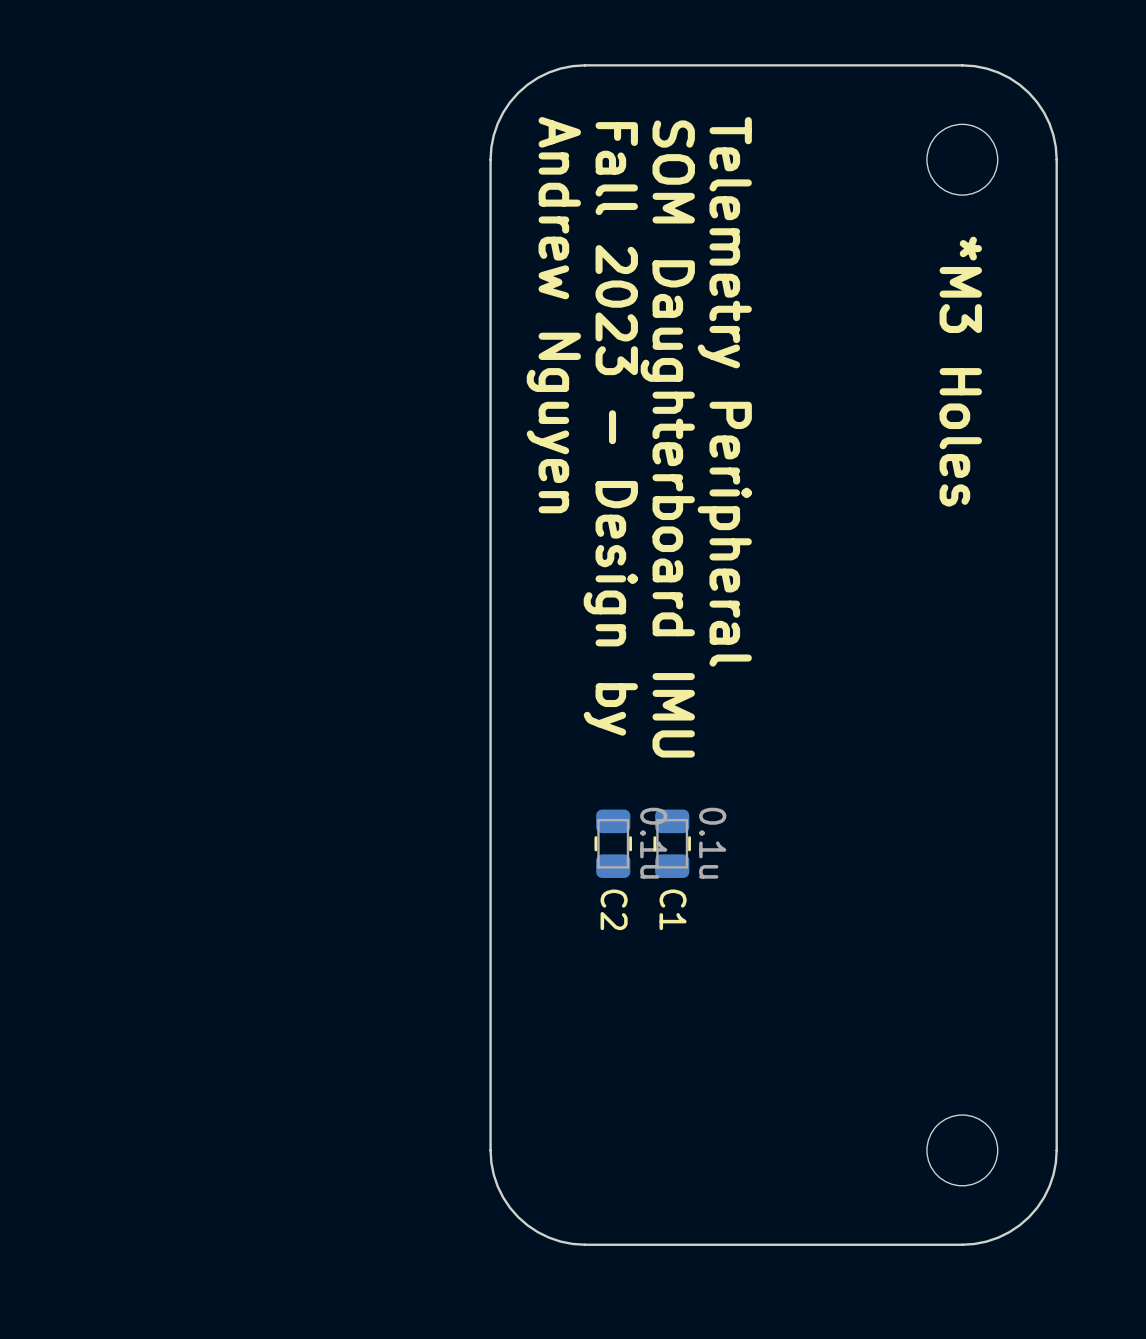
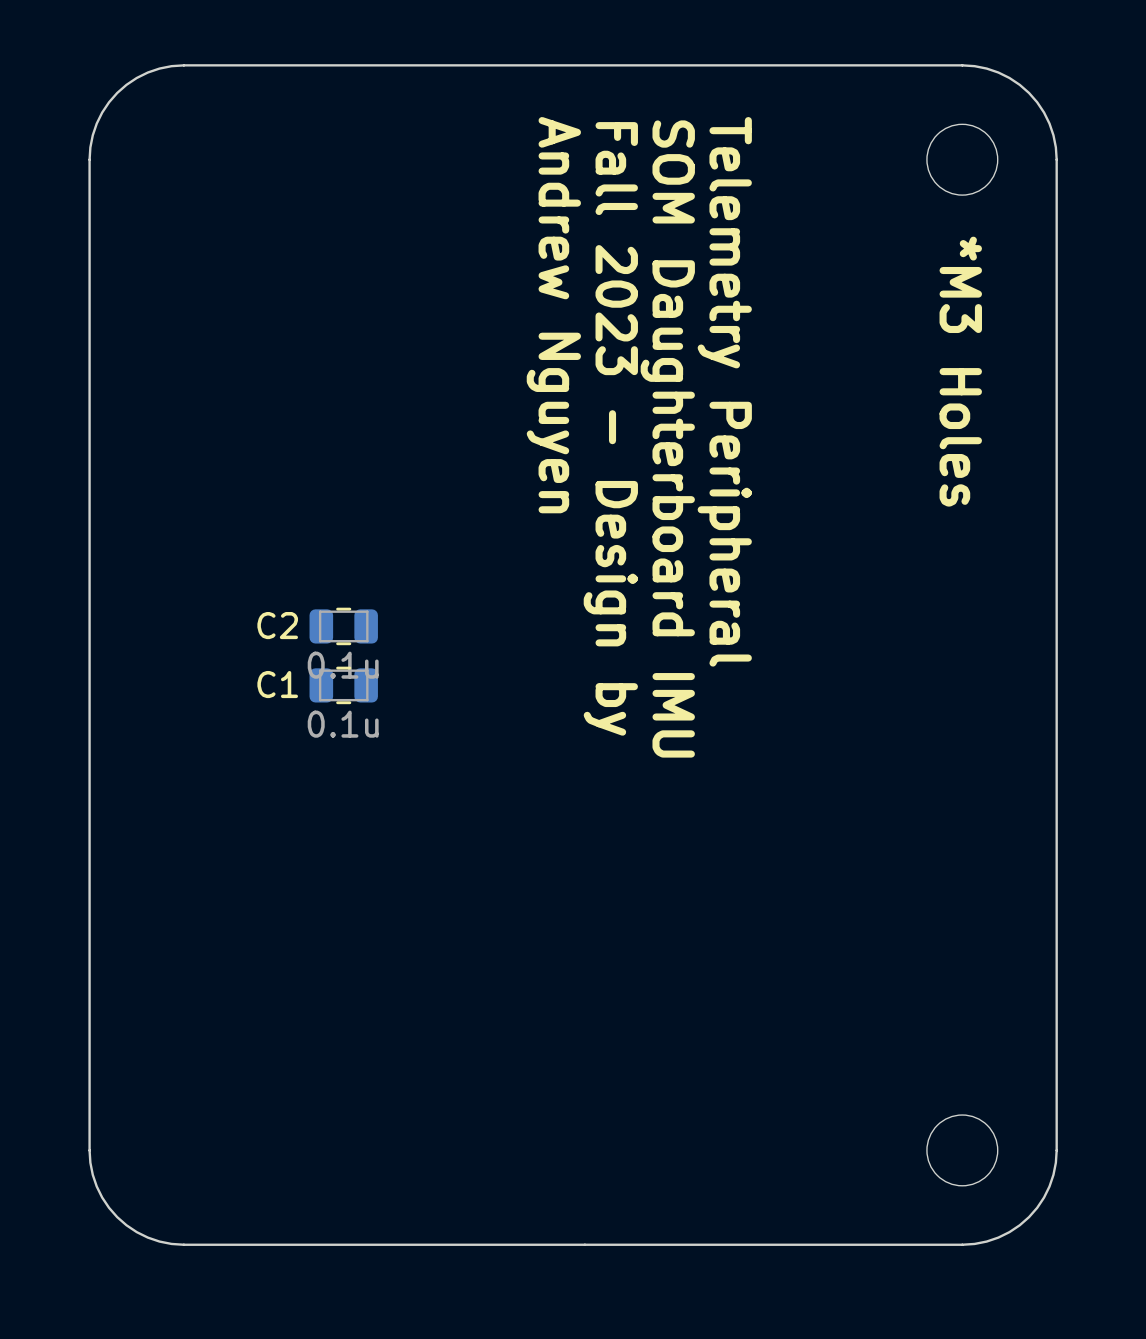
board edge: (584, 65) (560, 68) (548, 72) (537, 78) (518, 92) (510, 102) (497, 123) (493, 135) (490, 159) (491, 1162) (493, 1174) (503, 1197) (518, 1217) (537, 1232) (548, 1237) (560, 1241) (584, 1244) -> (584, 65) (171, 66) (147, 72) (136, 78) (117, 92) (109, 102) (96, 123) (92, 135) (89, 159) (89, 1150) (92, 1174) (96, 1186) (109, 1207) (126, 1225) (147, 1237) (171, 1243) (584, 1244)
C2 rotation: 0° (613, 843) -> 90° clockwise (343, 626)
C2 position: (613, 843) -> (343, 626)
C1 rotation: 0° (672, 843) -> 90° clockwise (343, 685)
C1 position: (672, 843) -> (343, 685)

